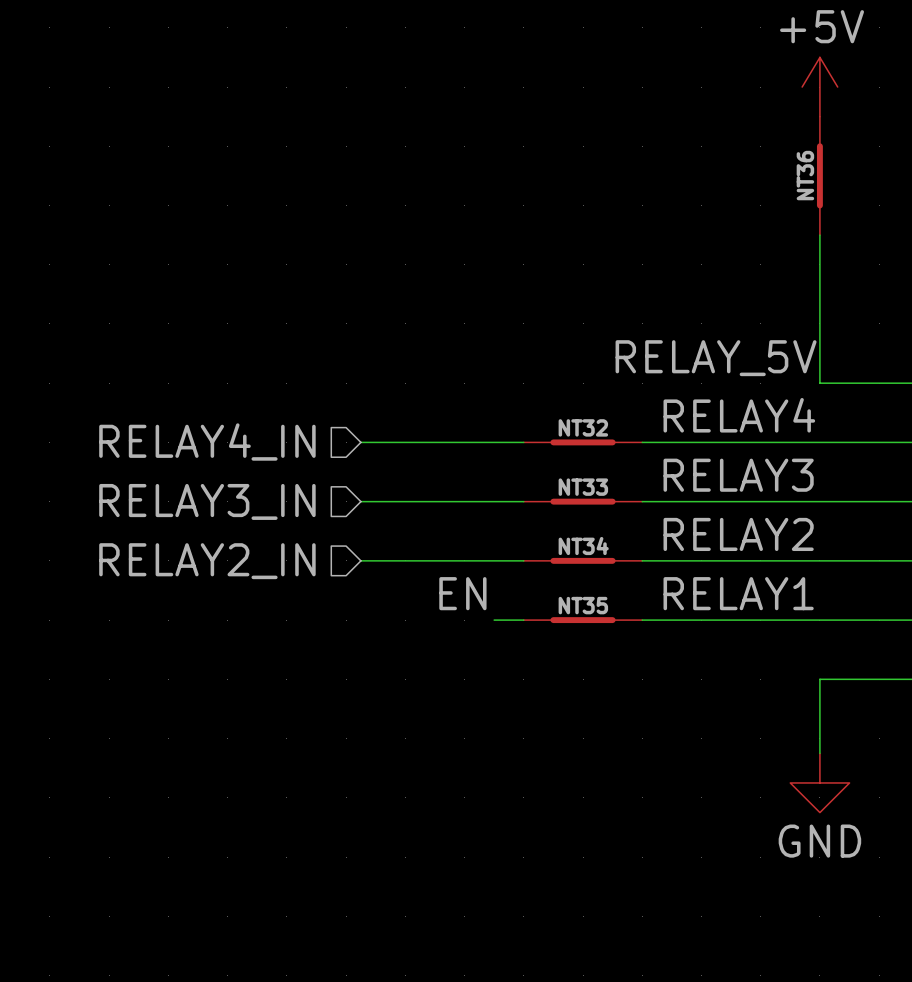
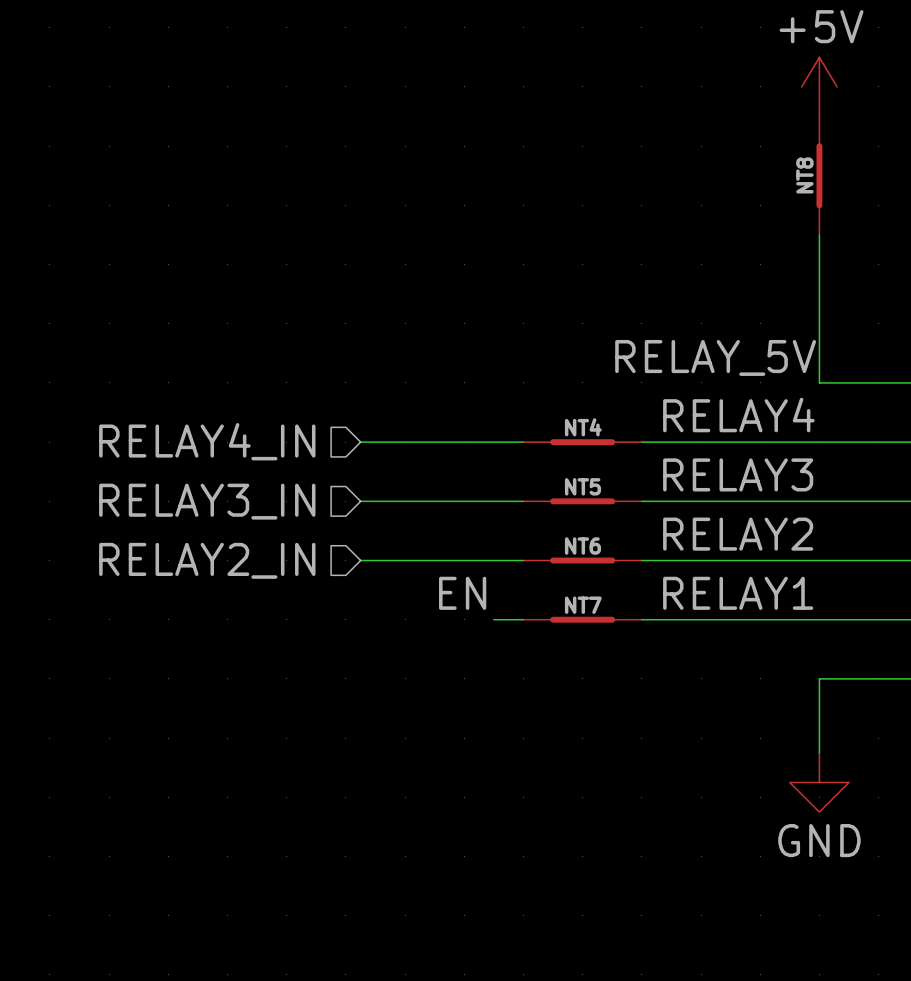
NT36 name: NT36 (805, 175) -> NT8 (804, 175)
NT32 name: NT32 (583, 427) -> NT4 (583, 427)
NT33 name: NT33 (583, 487) -> NT5 (582, 486)
NT34 name: NT34 (583, 546) -> NT6 (582, 546)
NT35 name: NT35 (583, 605) -> NT7 (583, 605)

